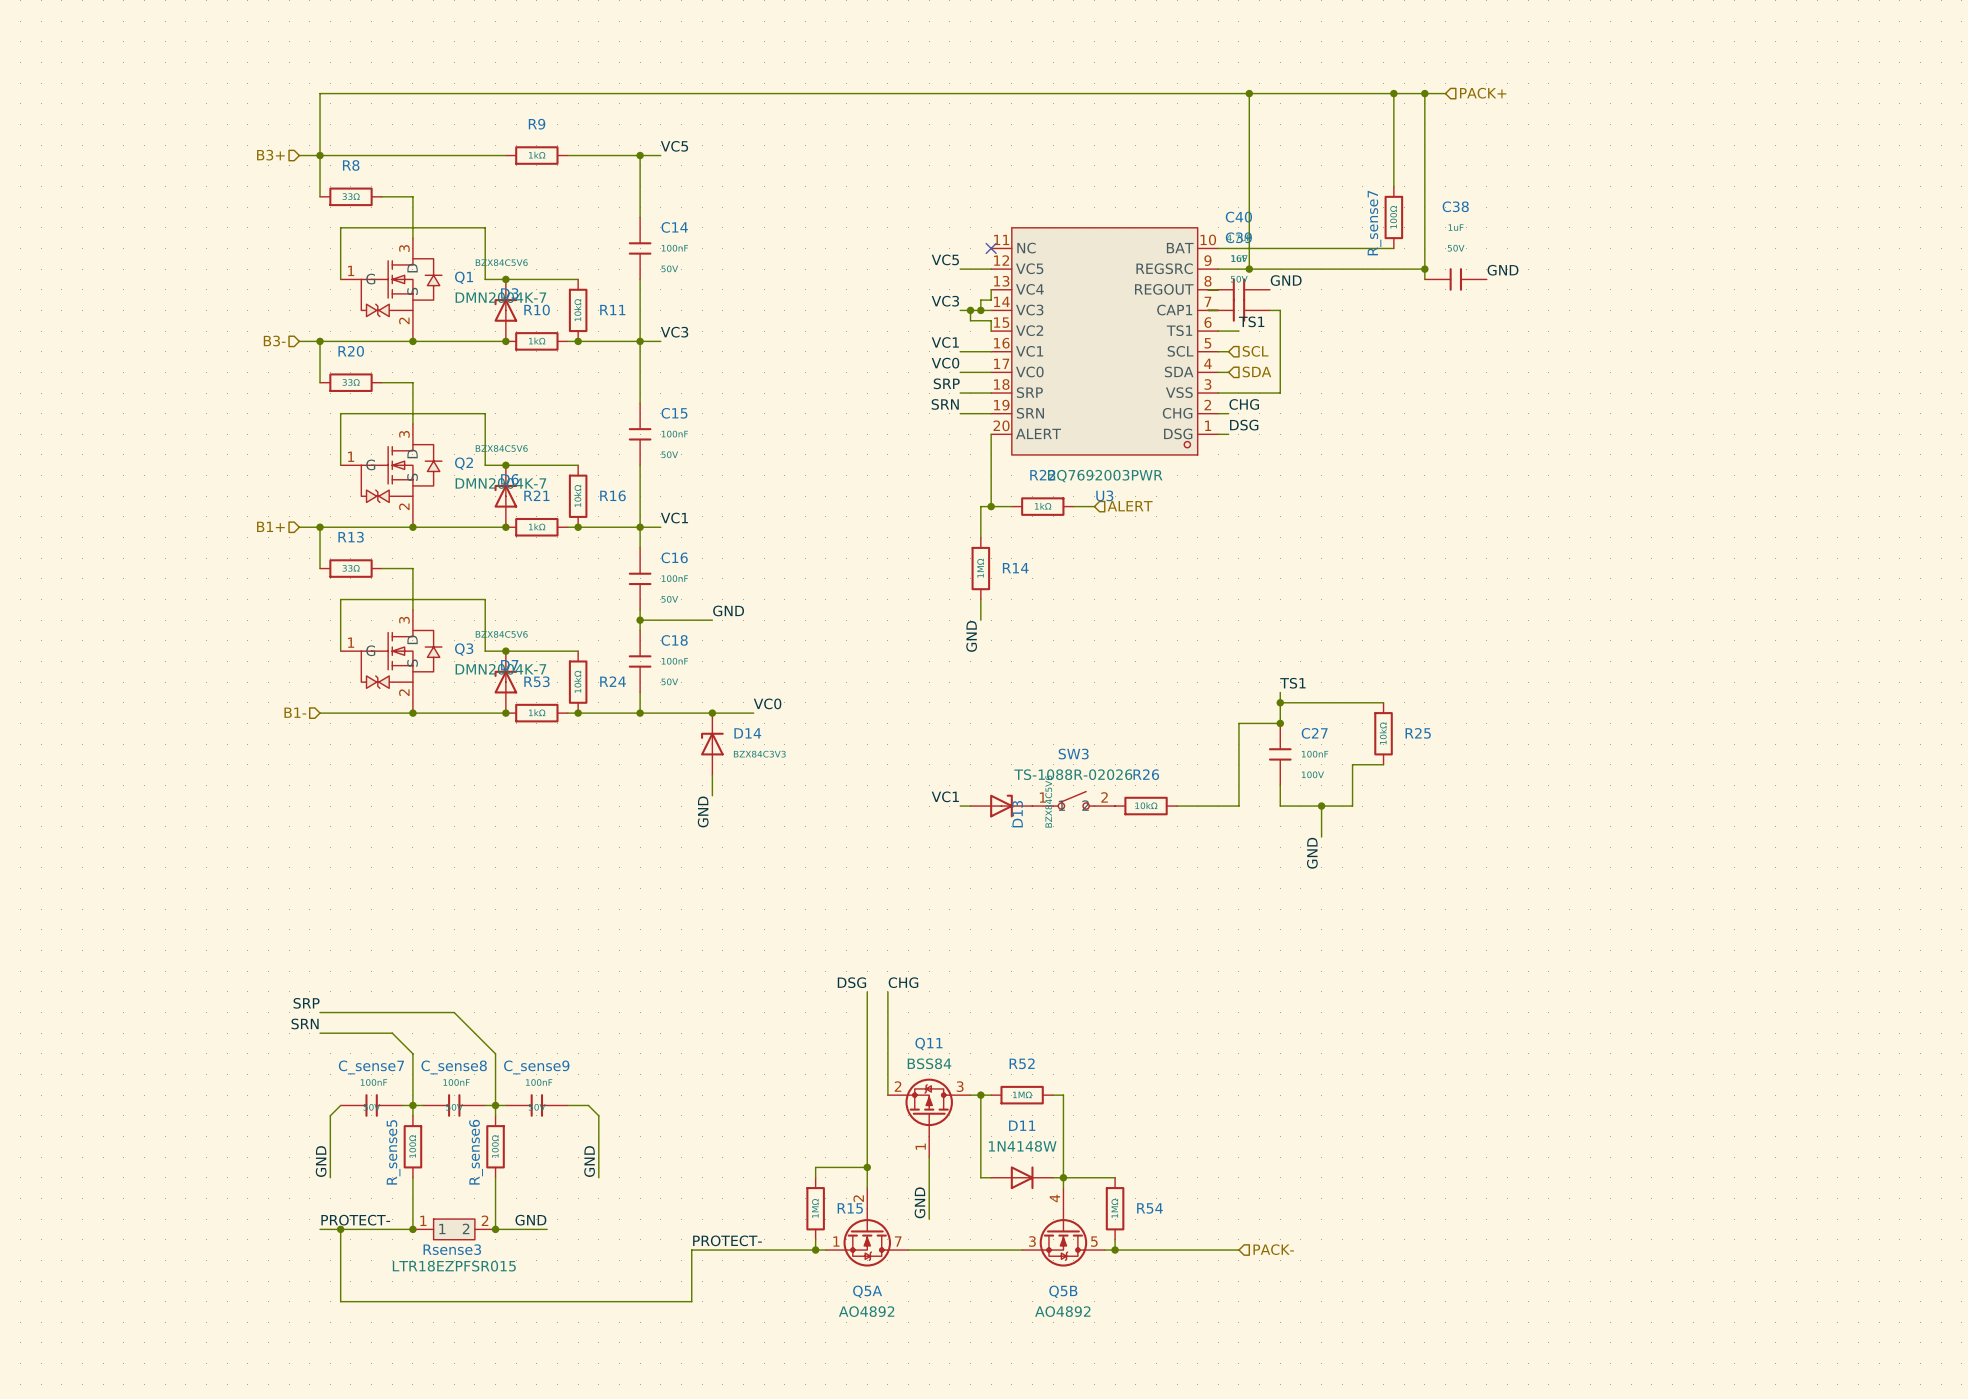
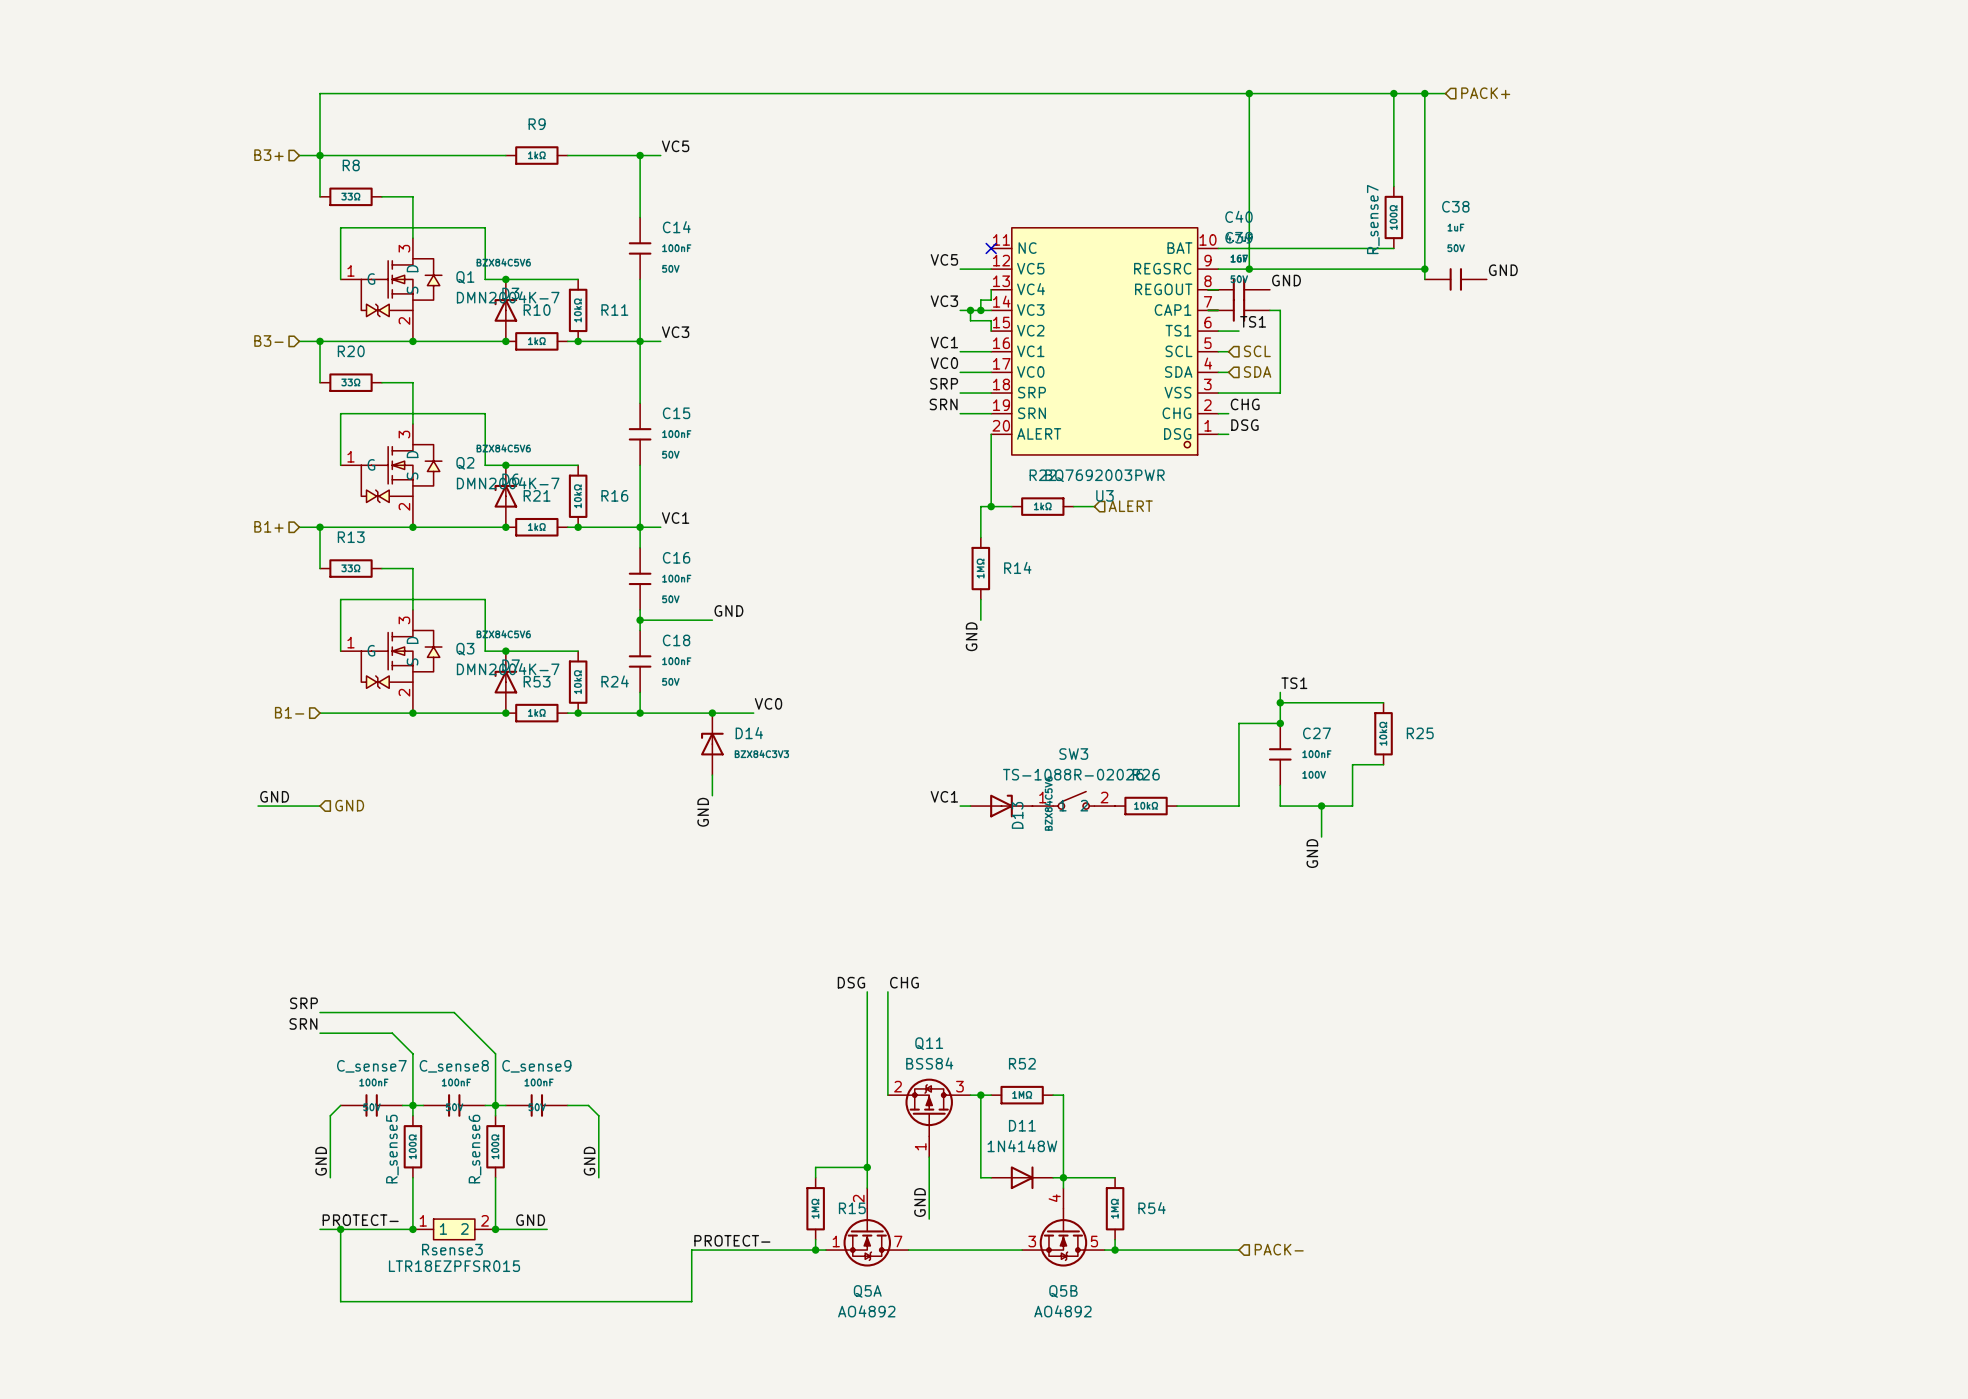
label: none -> GND (274, 796)
hierarchical label: none -> GND (349, 805)
wire: none -> (258, 806) (320, 806)

